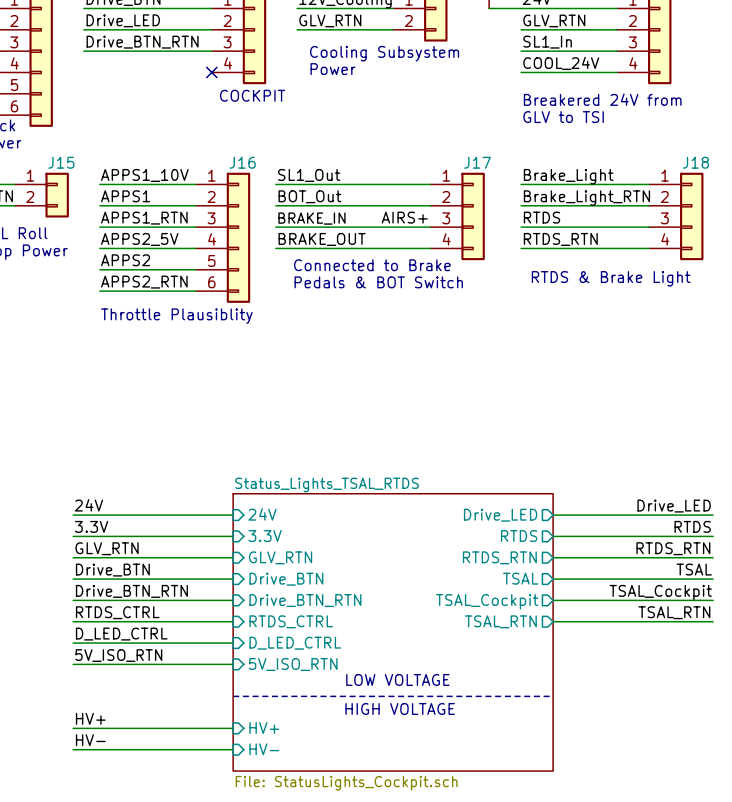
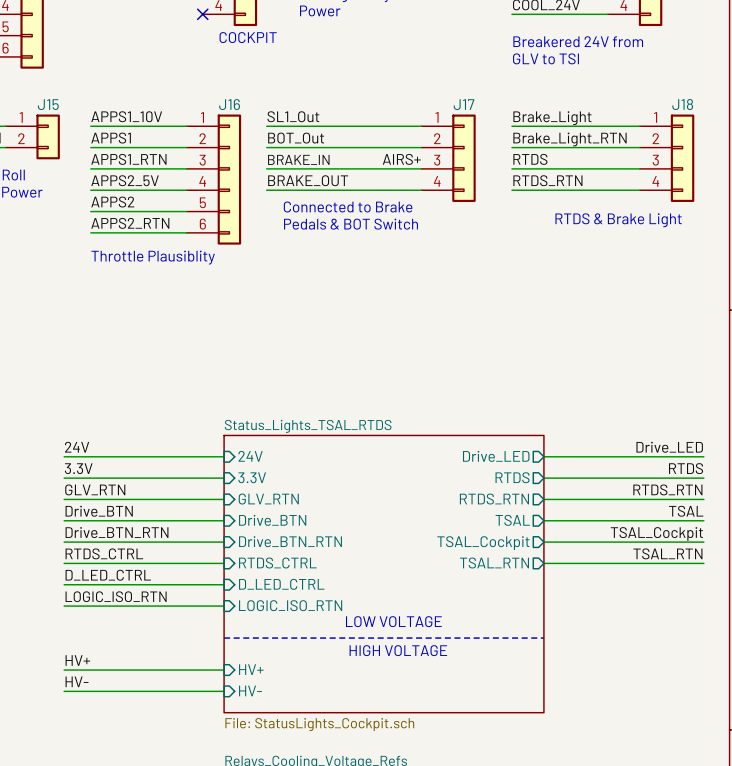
label: 5V_ISO_RTN (118, 655) -> LOGIC_ISO_RTN (116, 596)
sheet pin: 5V_ISO_RTN (293, 664) -> LOGIC_ISO_RTN (290, 605)

